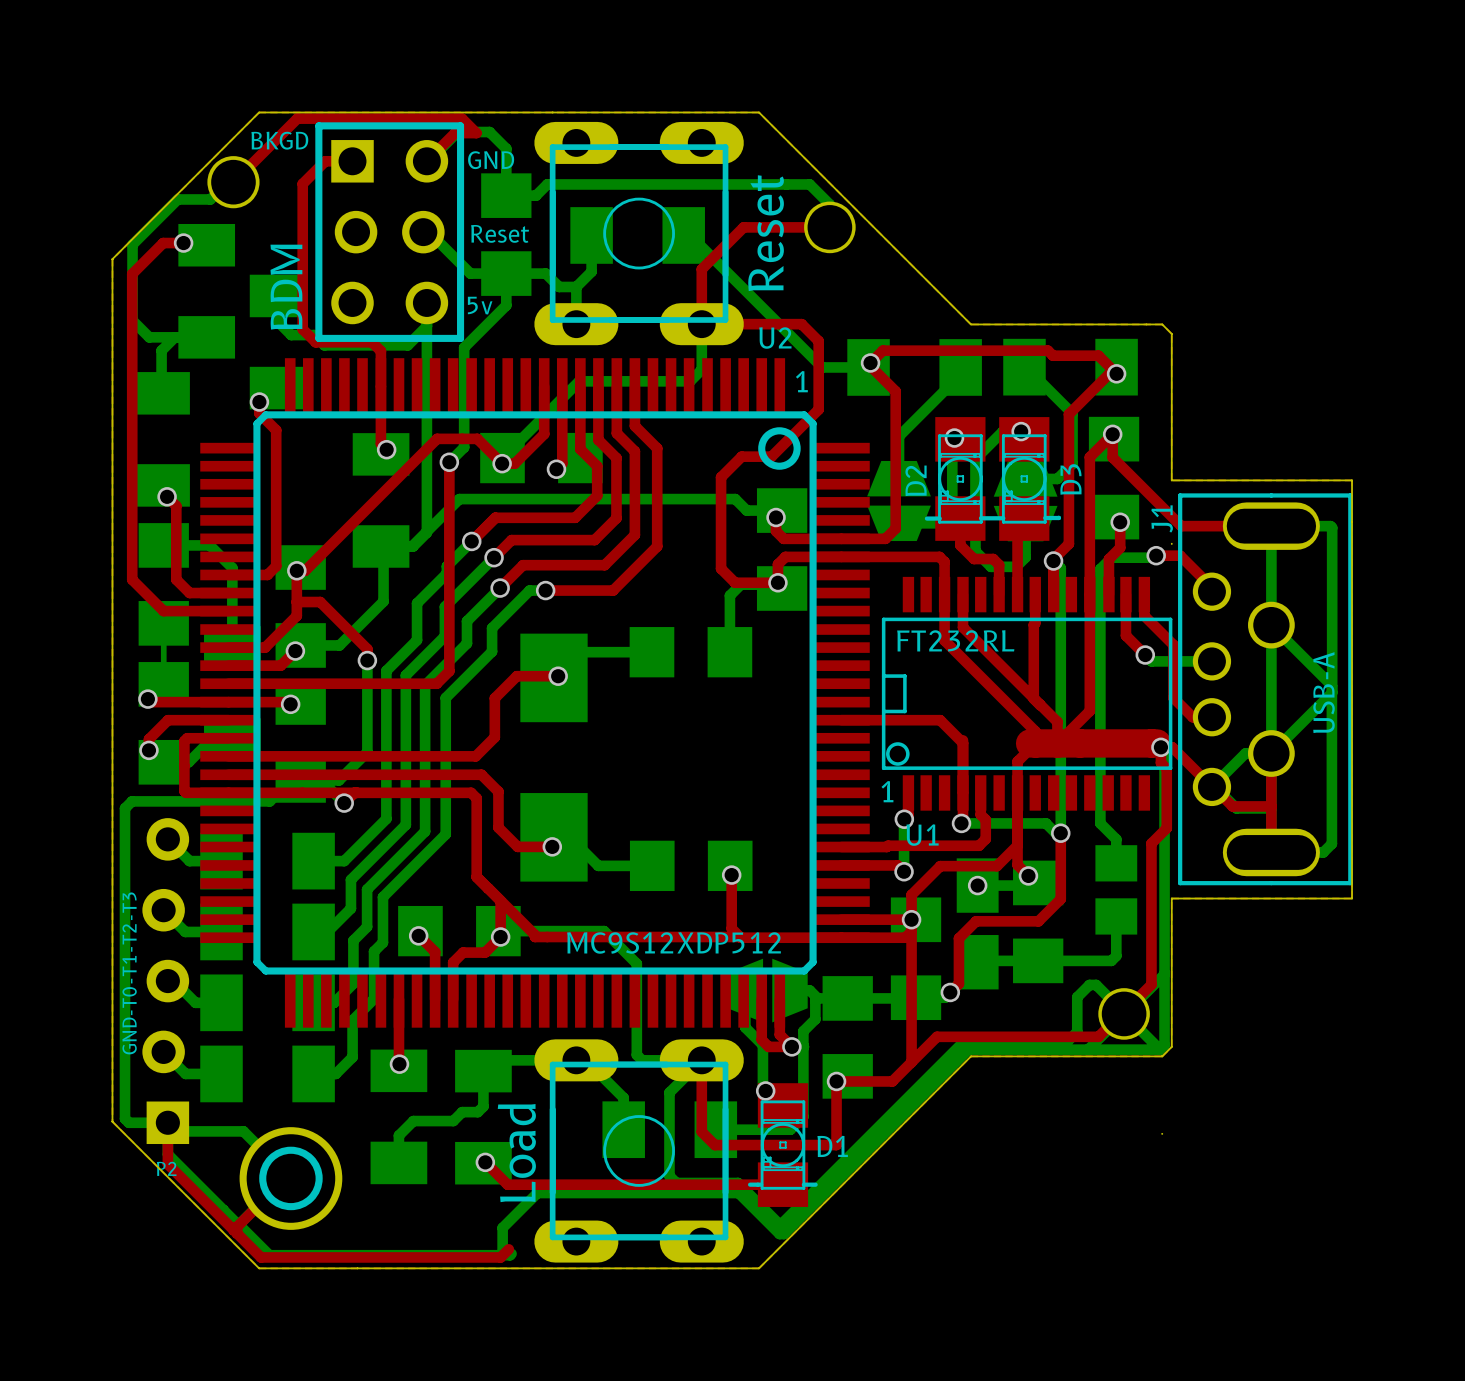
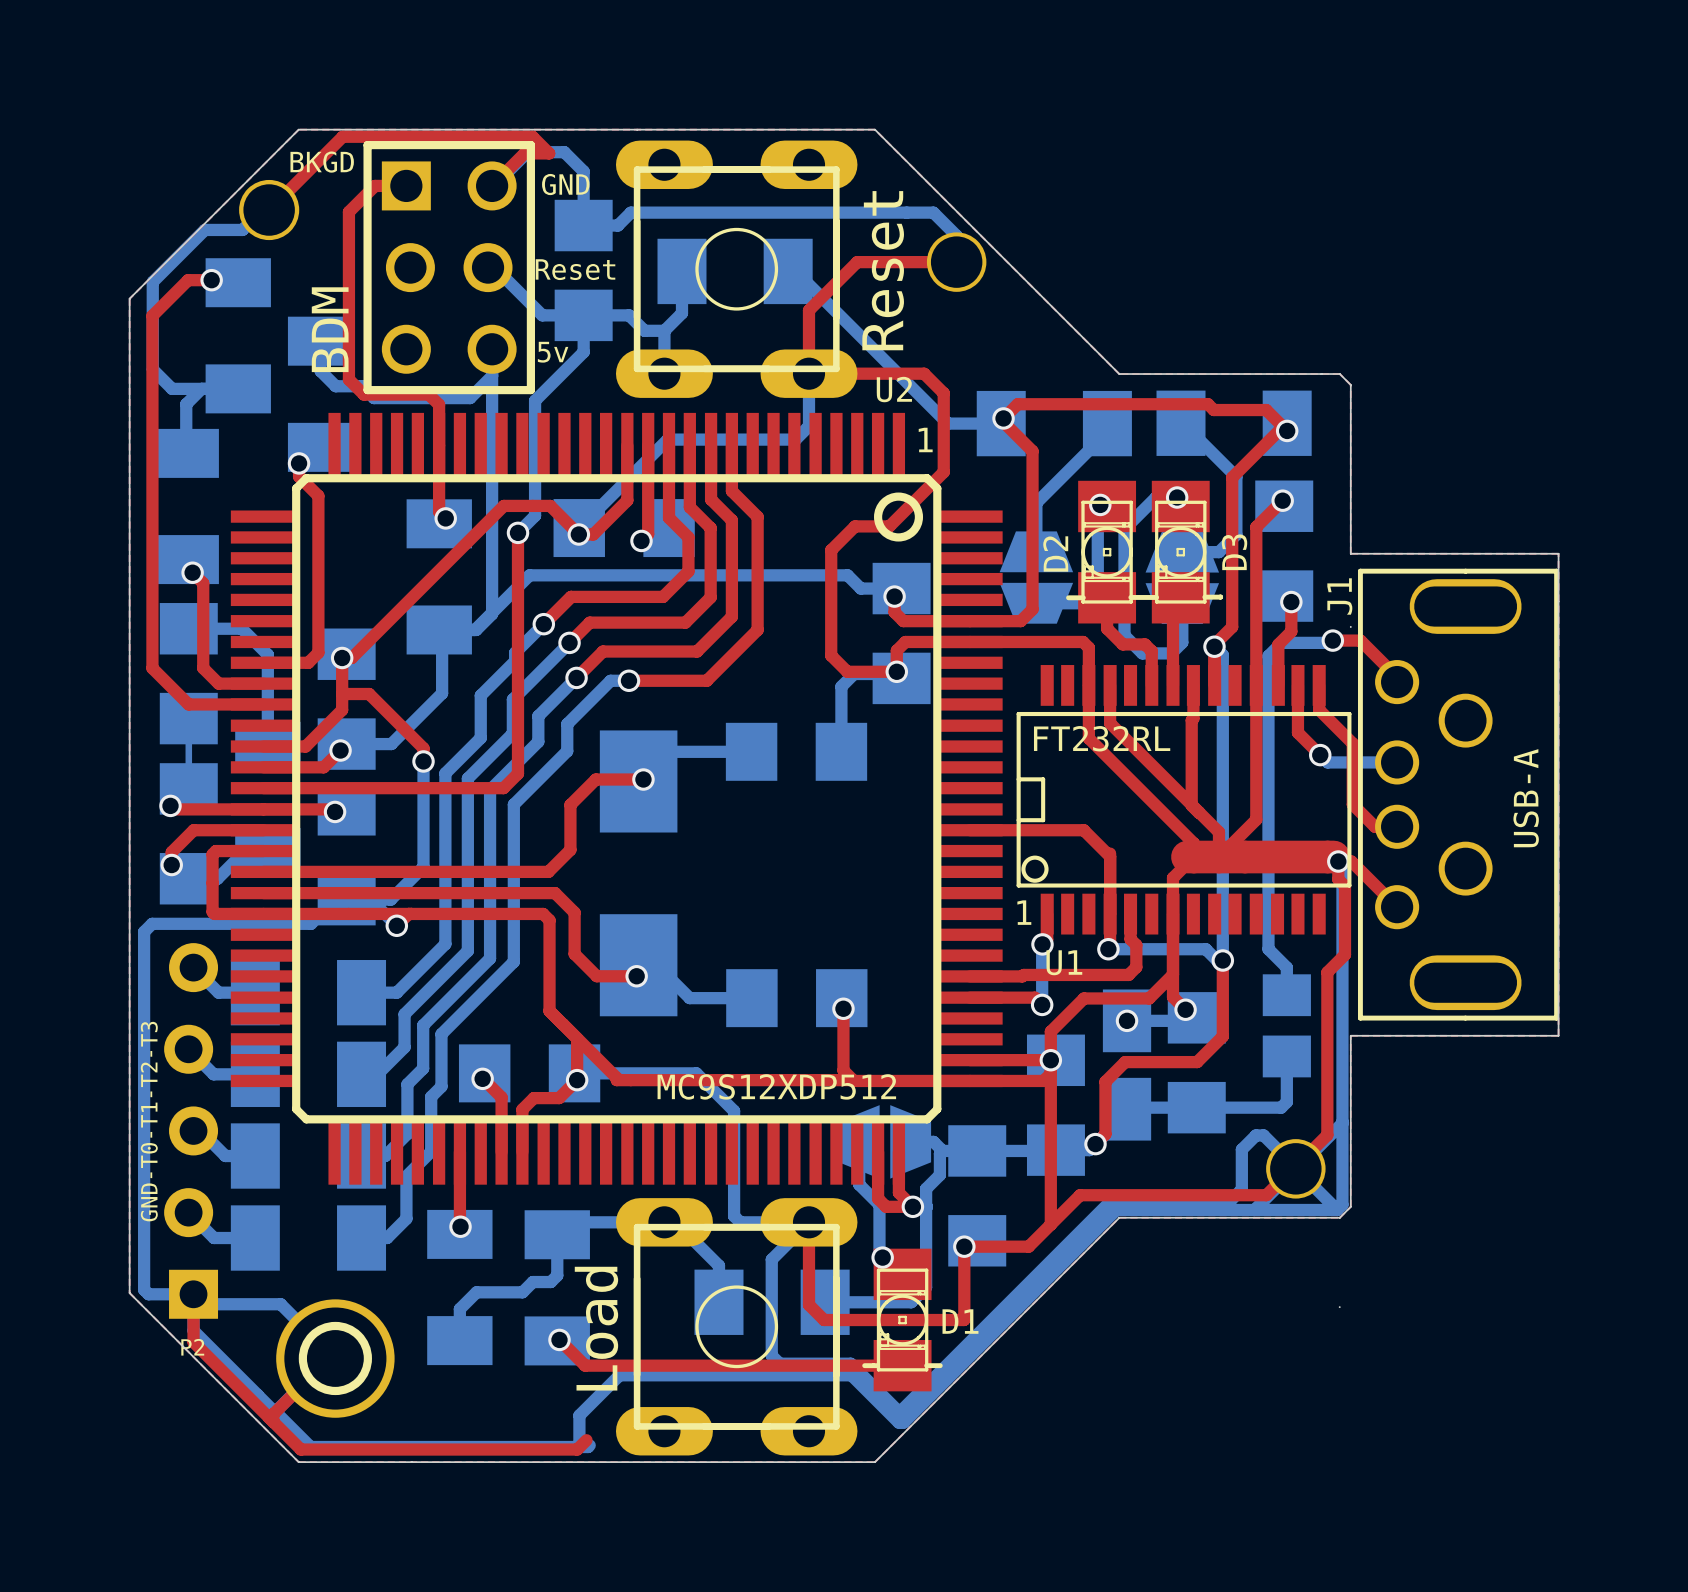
top track: (1112, 434) (1112, 457) (1181, 526) (1271, 526) -> none
bottom track: (1271, 625) (1331, 685) (1331, 843) (1323, 852) (1271, 852) (1271, 526) (1330, 526) (1332, 527) (1332, 692) (1271, 753) (1245, 753) (1211, 786) (1215, 786) (1236, 808) (1271, 808) -> none
top track: (1271, 753) (1271, 852) -> none
top track: (1211, 786) (1232, 806) (1271, 806) -> none

